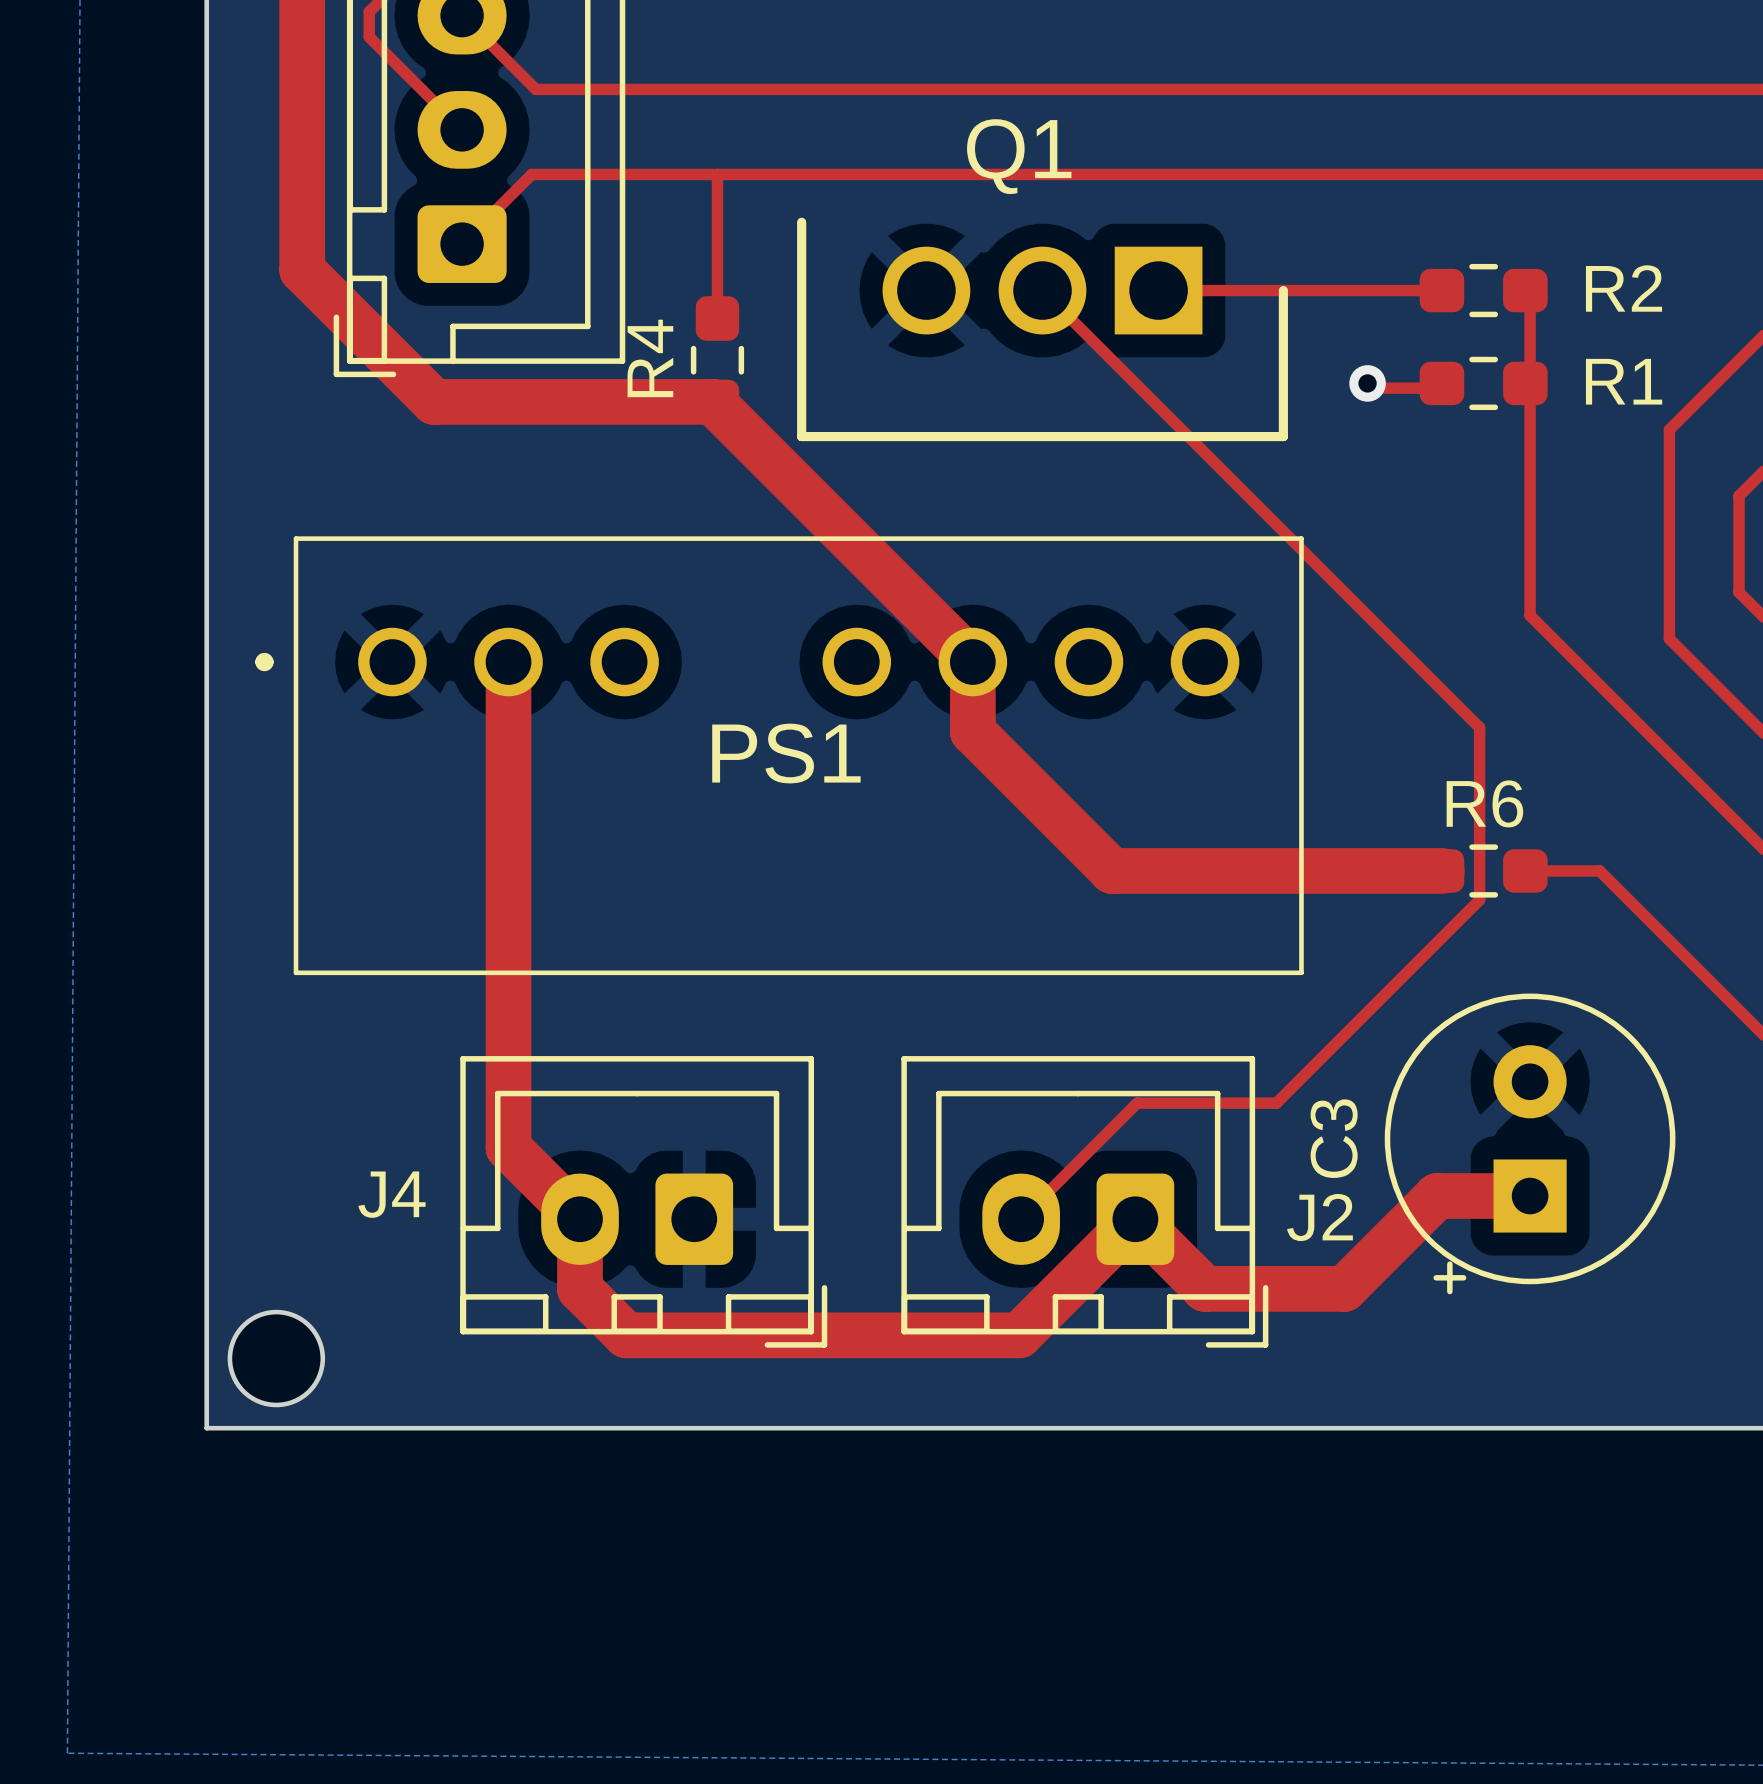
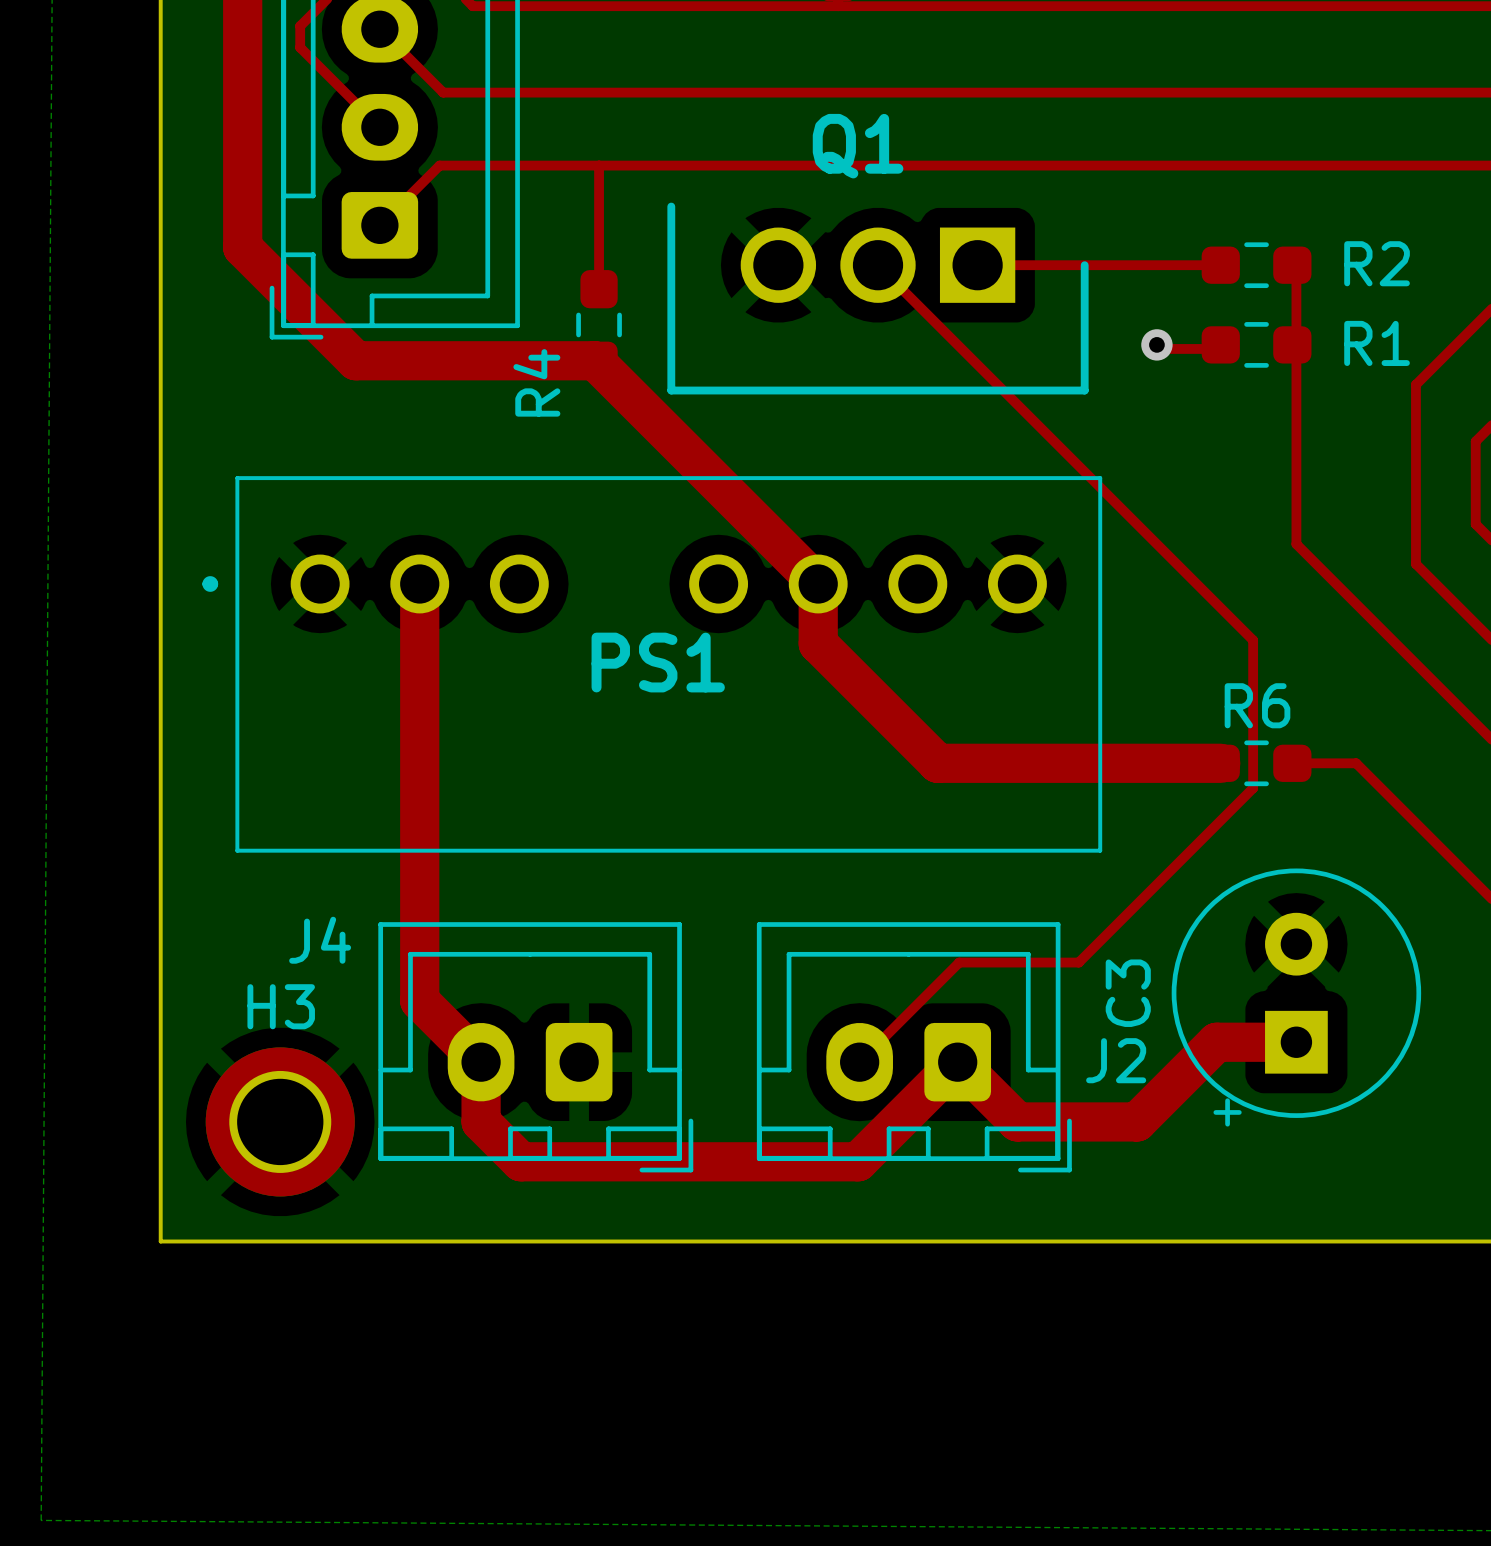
R4 name position: R4 (650, 358) -> R4 (536, 382)
J4 name position: J4 (391, 1194) -> J4 (320, 940)
H3: none -> (280, 1121)
round board edge: [227, 1309, 326, 1408] -> none

